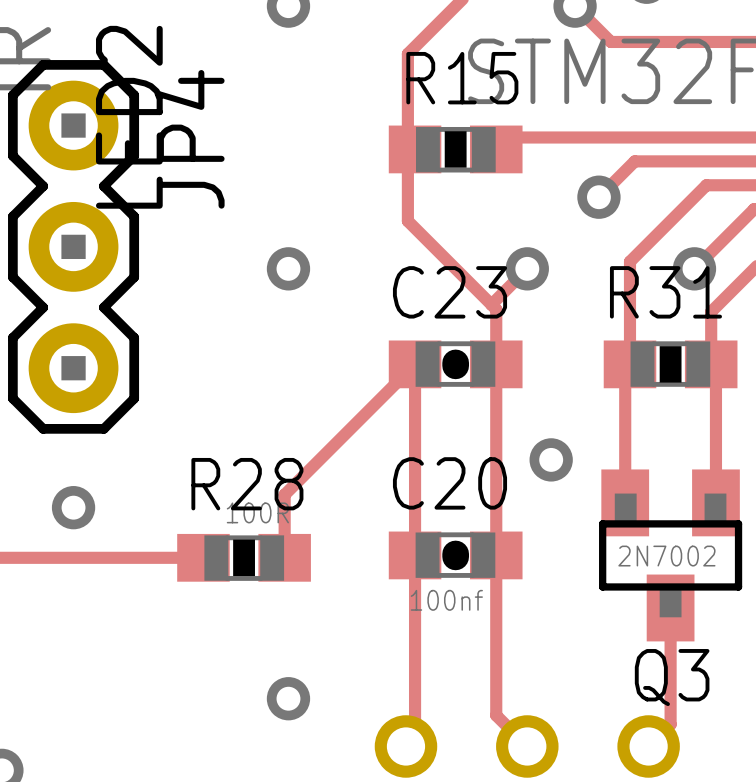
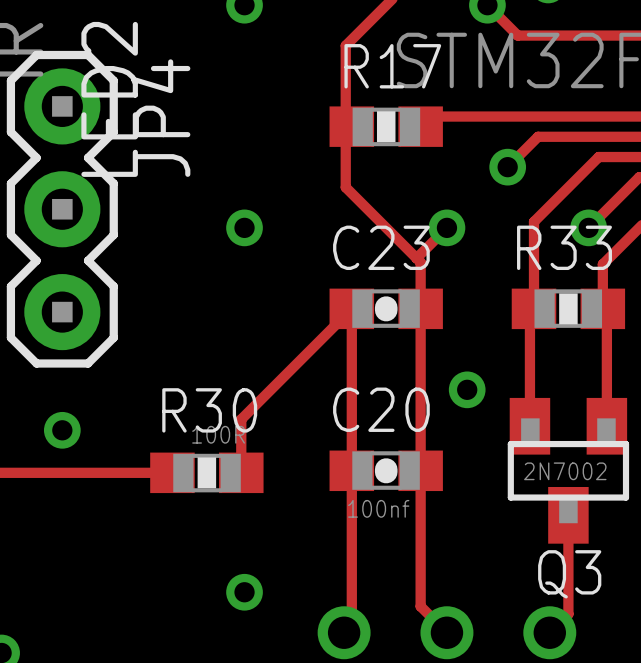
R15 name: R15 (462, 78) -> R17 (392, 66)
R31 name: R31 (665, 292) -> R33 (564, 247)
R28 name: R28 (247, 484) -> R30 (209, 410)

